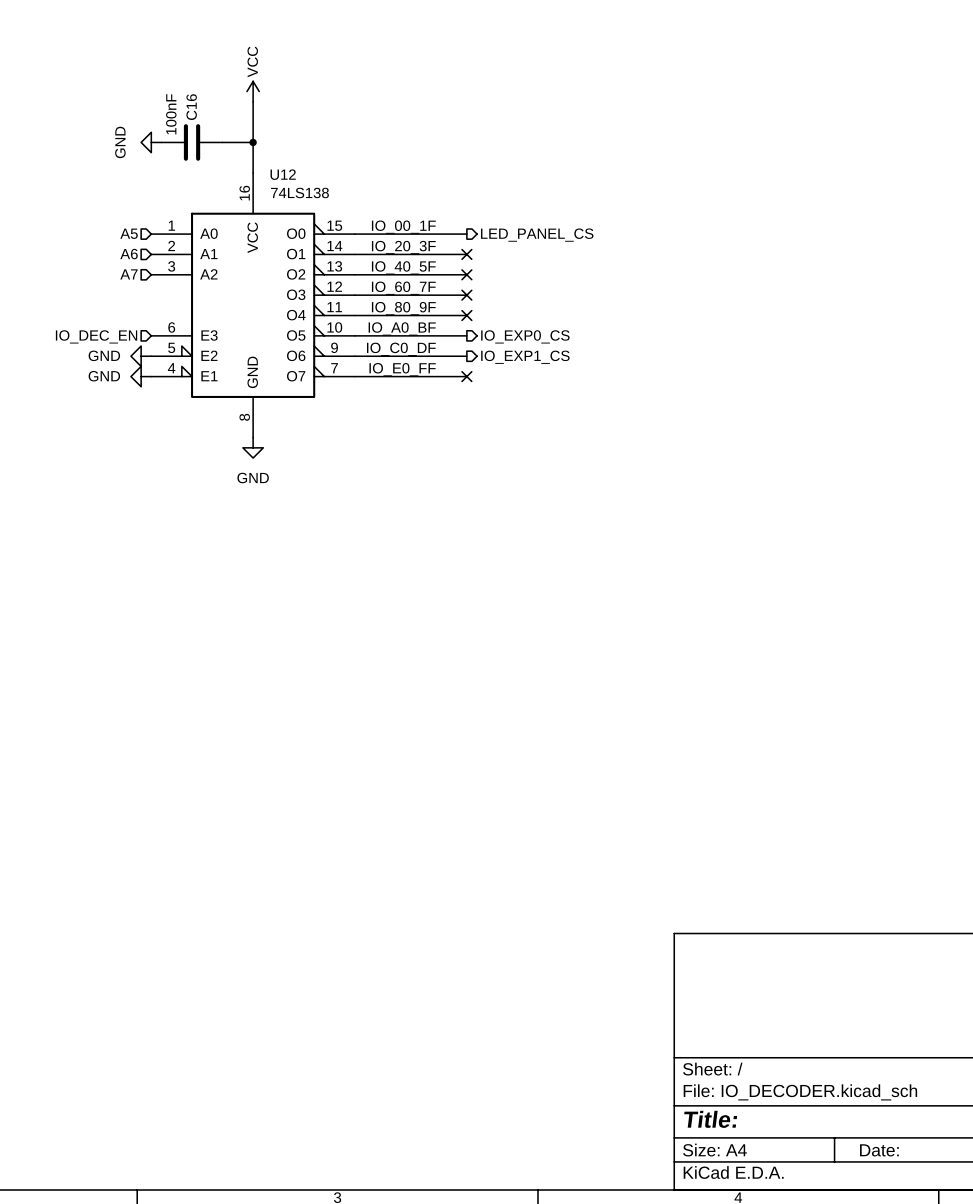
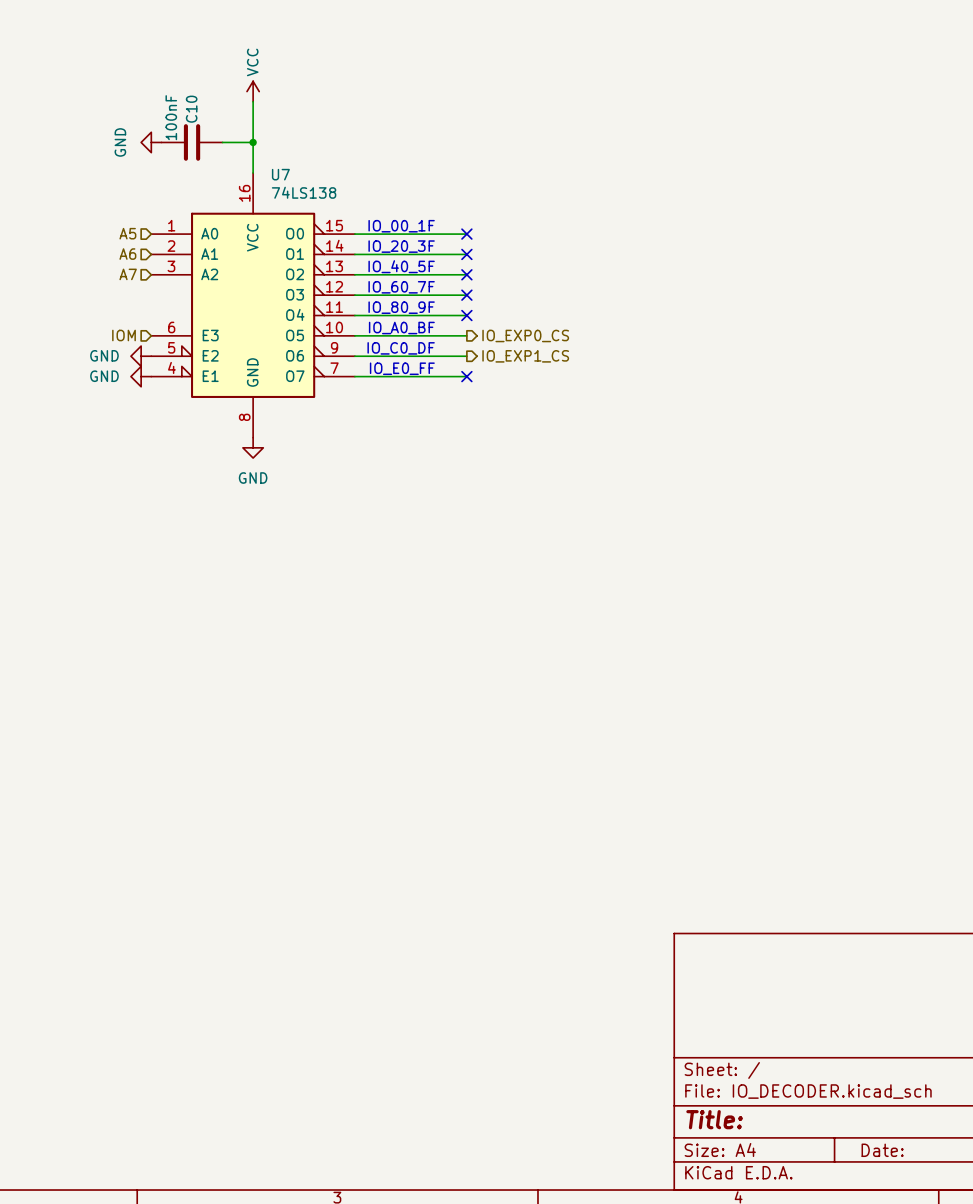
C16 name: C16 (191, 107) -> C10 (191, 109)
U12 name: U12 (283, 174) -> U7 (280, 174)
no-connect mark: none -> (466, 234)
hierarchical label: LED_PANEL_CS (537, 235) -> none
hierarchical label: IO_DEC_EN (96, 336) -> IOM (124, 335)

